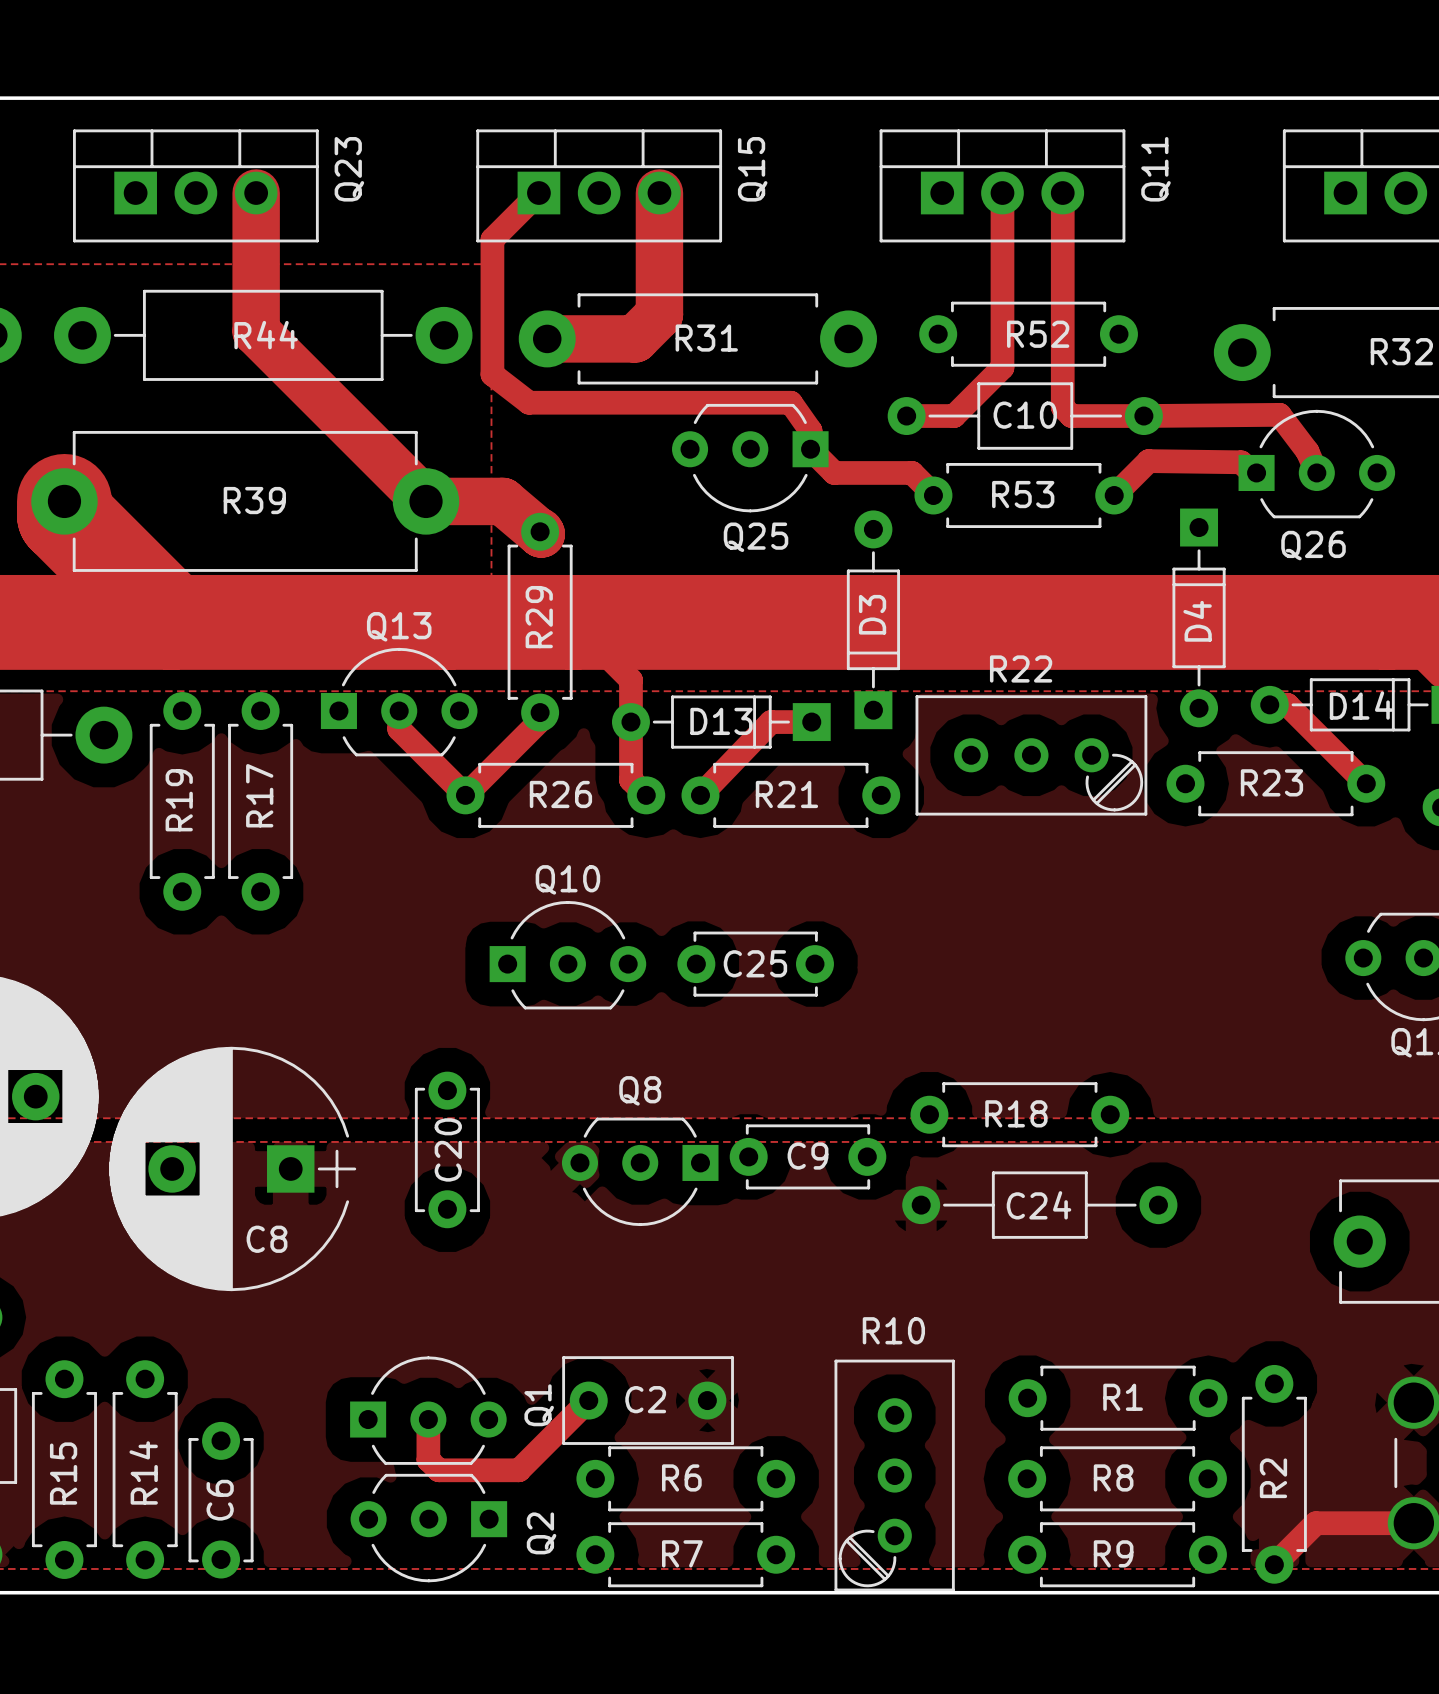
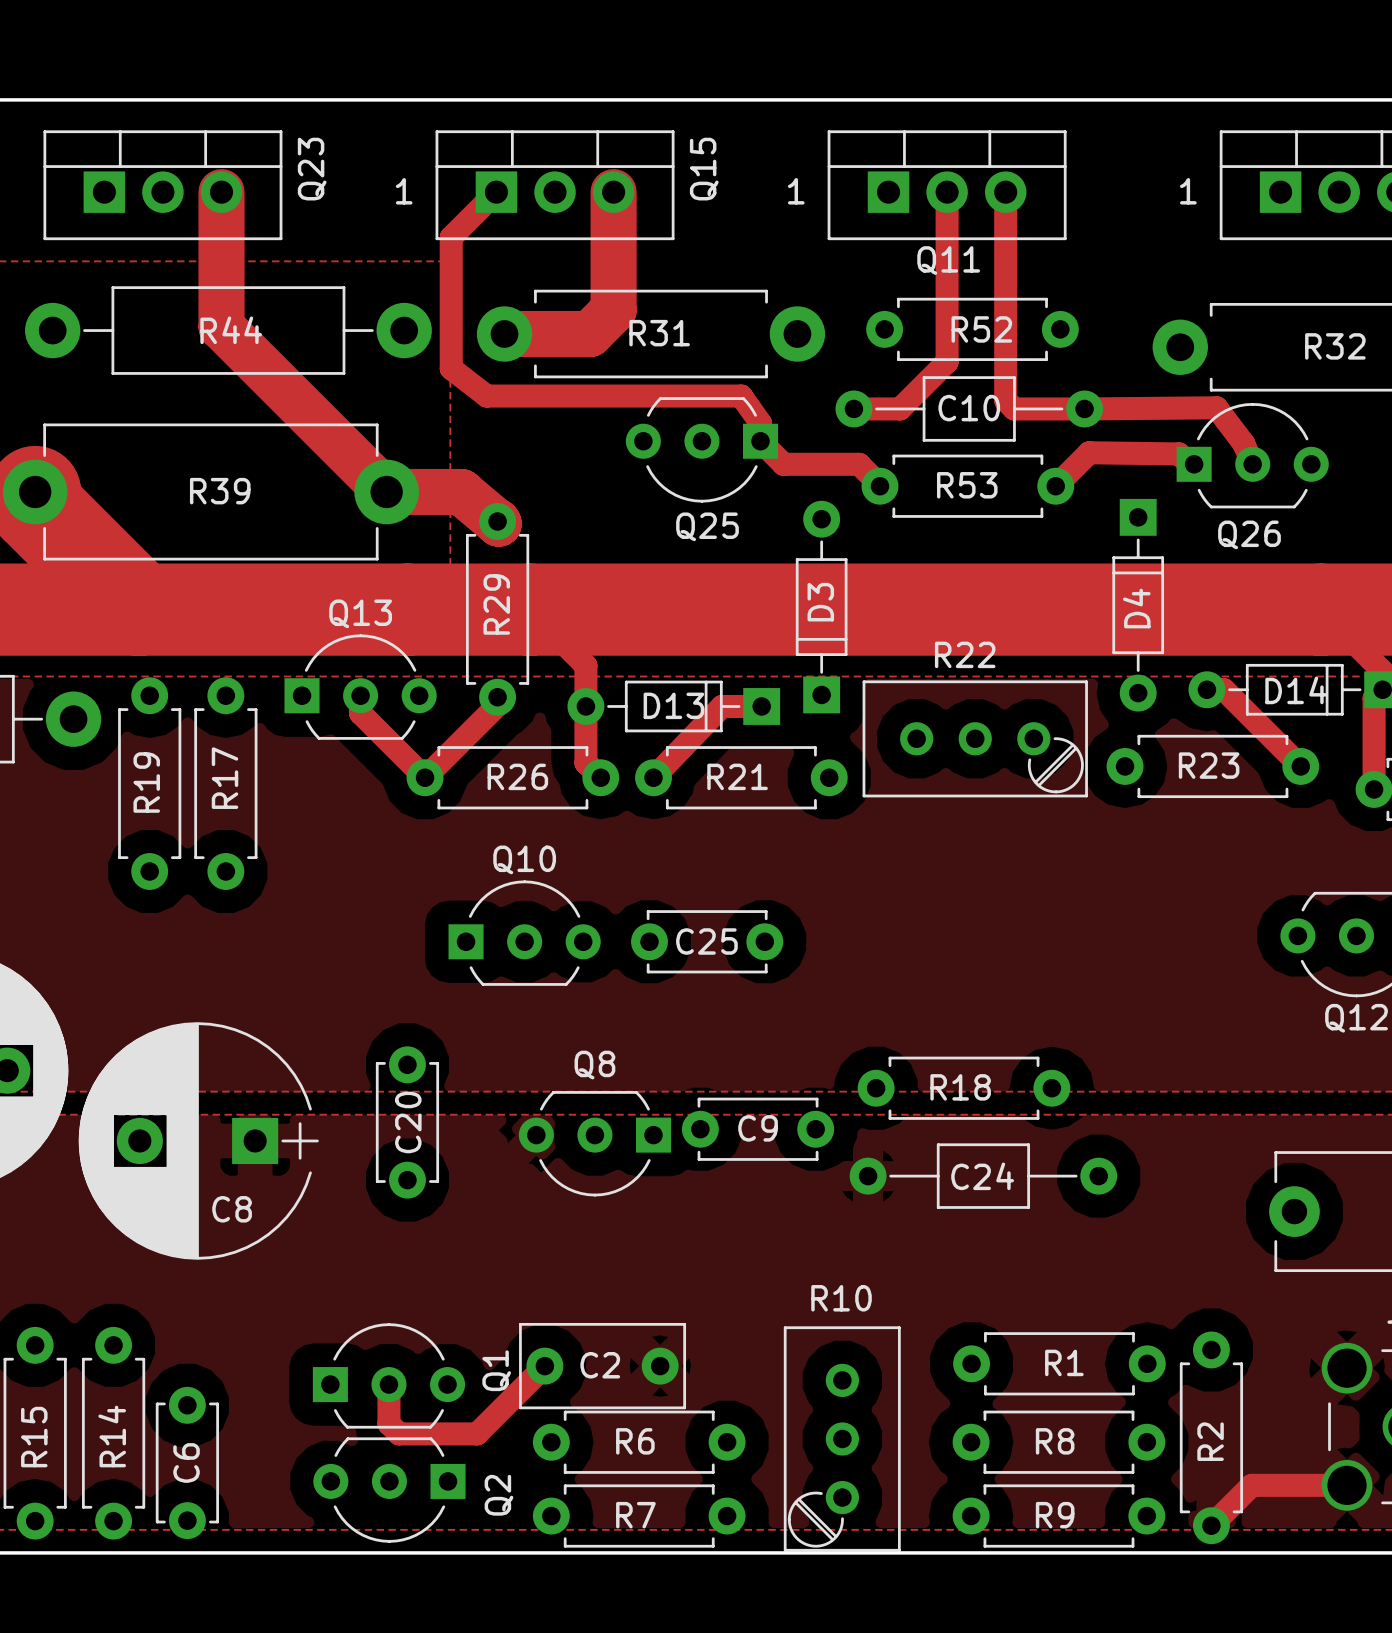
Q11 name rotation: 0° (1155, 169) -> 90° clockwise (948, 260)
Q11 name position: Q11 (1155, 169) -> Q11 (948, 260)
text: none -> 1 (404, 191)
text: none -> 1 (796, 191)
text: none -> 1 (1188, 191)

